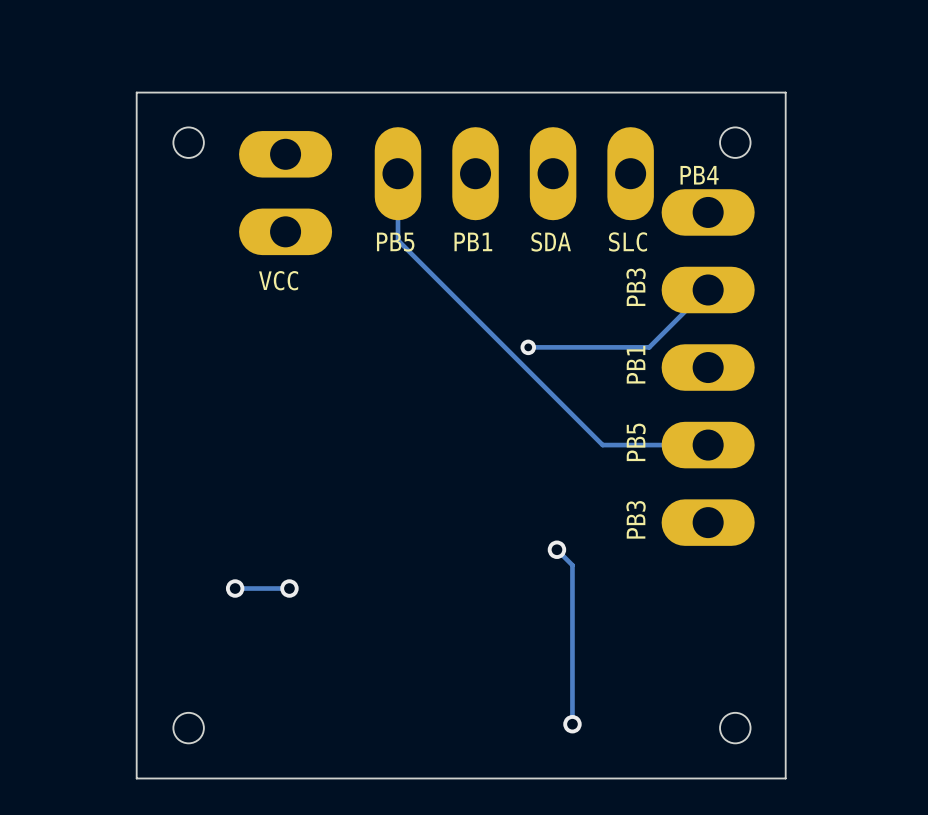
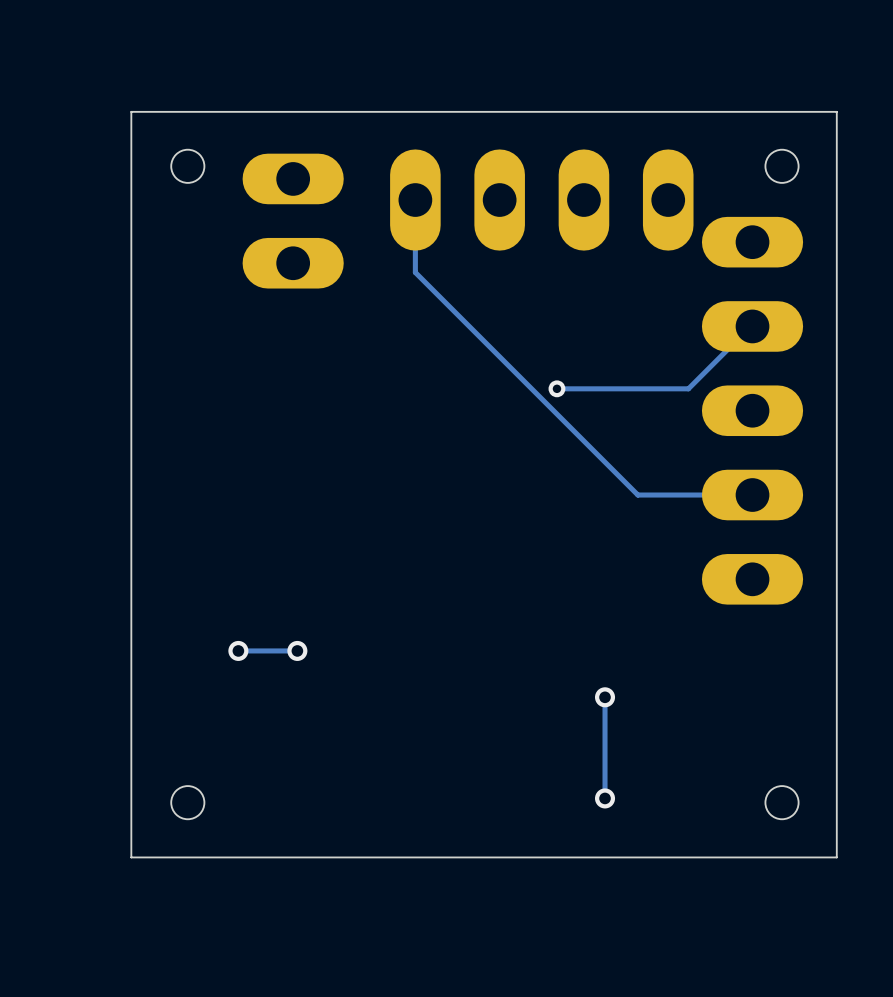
text: PB4 (699, 175) -> none
text: PB1 (473, 241) -> none
text: SDA (551, 241) -> none
text: SLC (627, 241) -> none
text: PB5 (395, 242) -> none
text: VCC (278, 280) -> none
text: PB3 (636, 287) -> none
text: PB1 (636, 364) -> none
text: PB5 (636, 442) -> none
text: PB3 (636, 519) -> none
track: (556, 549) (572, 565) (572, 631) -> none
via position: (556, 549) -> (605, 697)

